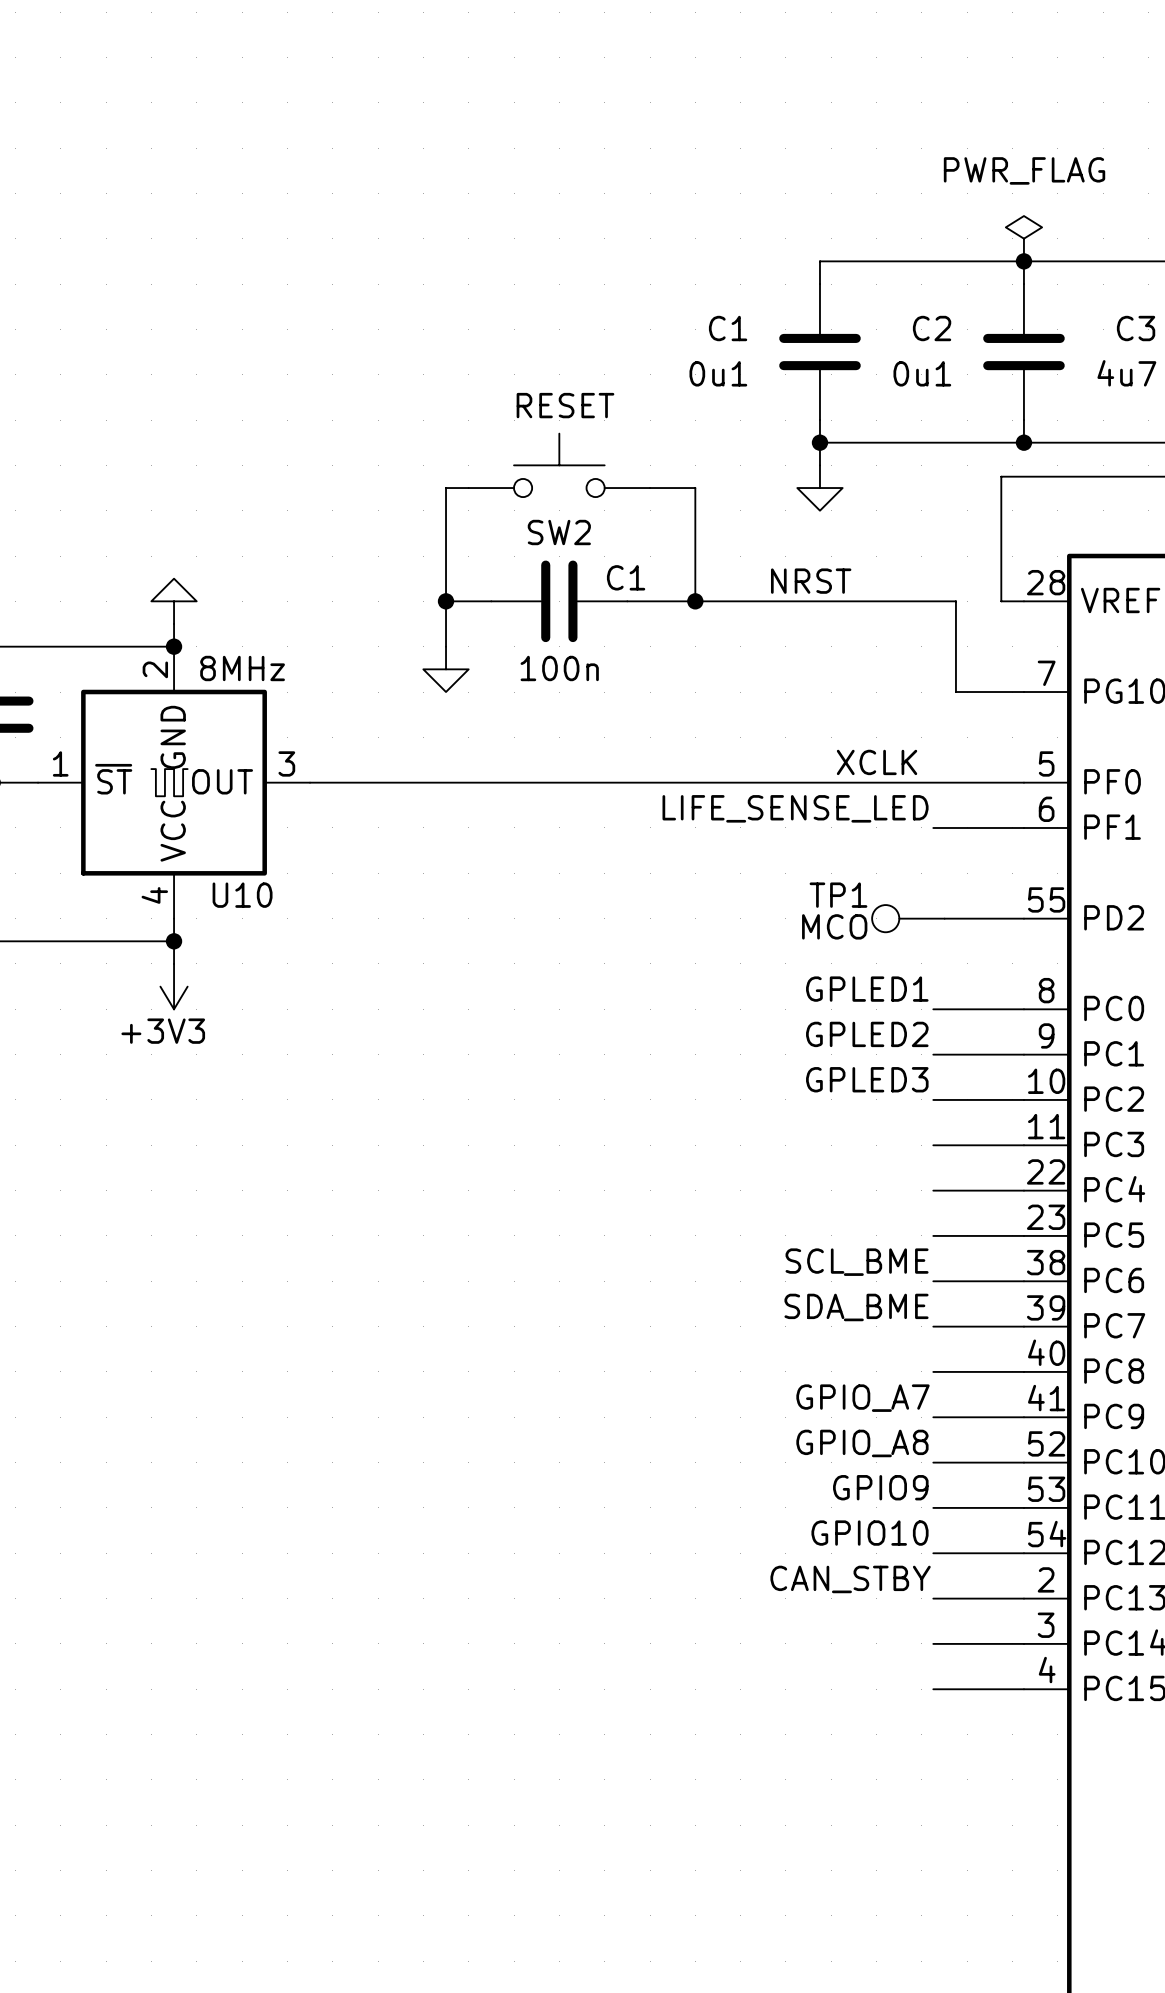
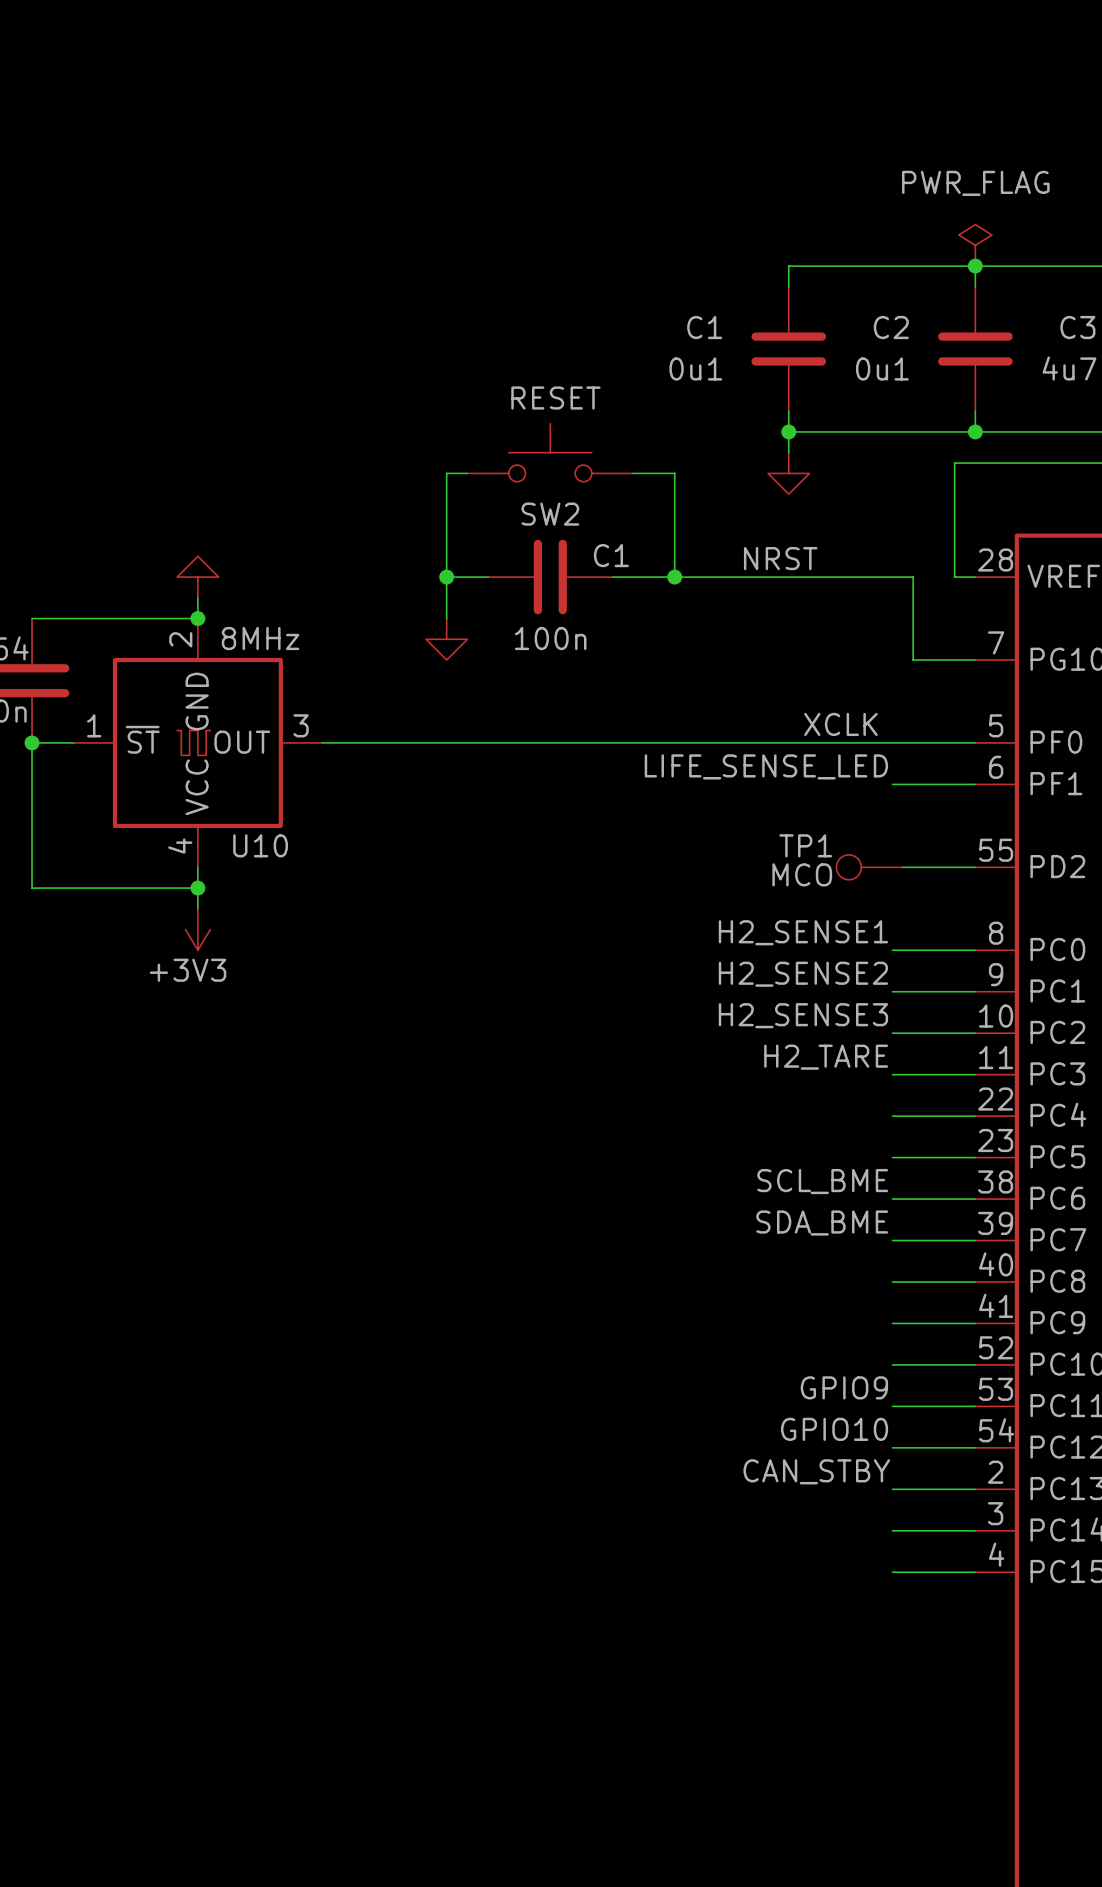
label: GPLED1 (867, 989) -> H2_SENSE1 (803, 932)
label: GPLED2 (867, 1034) -> H2_SENSE2 (803, 974)
label: GPLED3 (867, 1079) -> H2_SENSE3 (803, 1015)
label: none -> H2_TARE (826, 1057)
label: GPIO_A7 (862, 1398) -> none
label: GPIO_A8 (862, 1443) -> none

